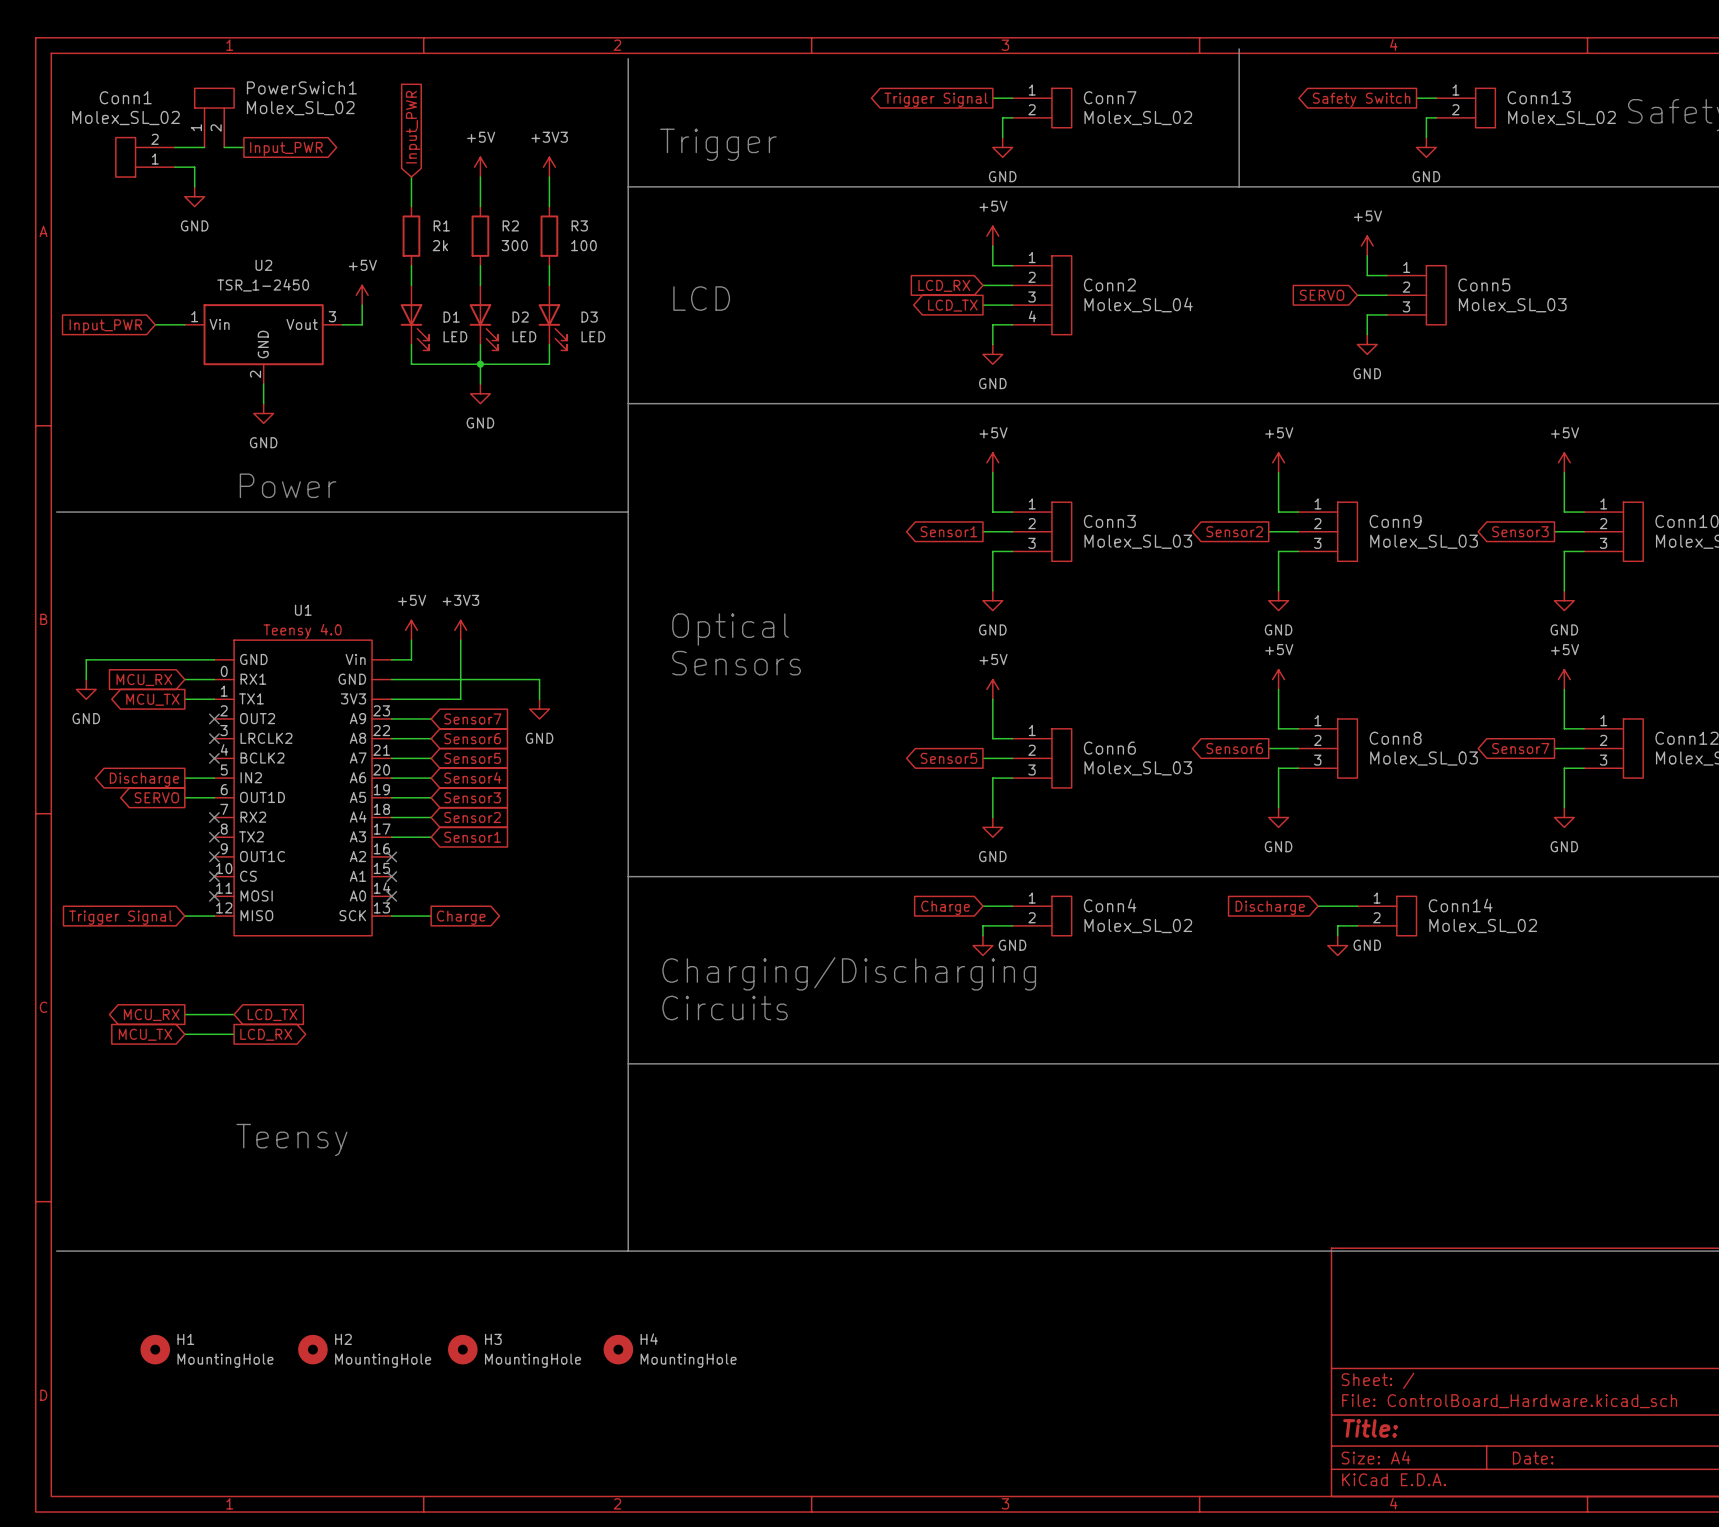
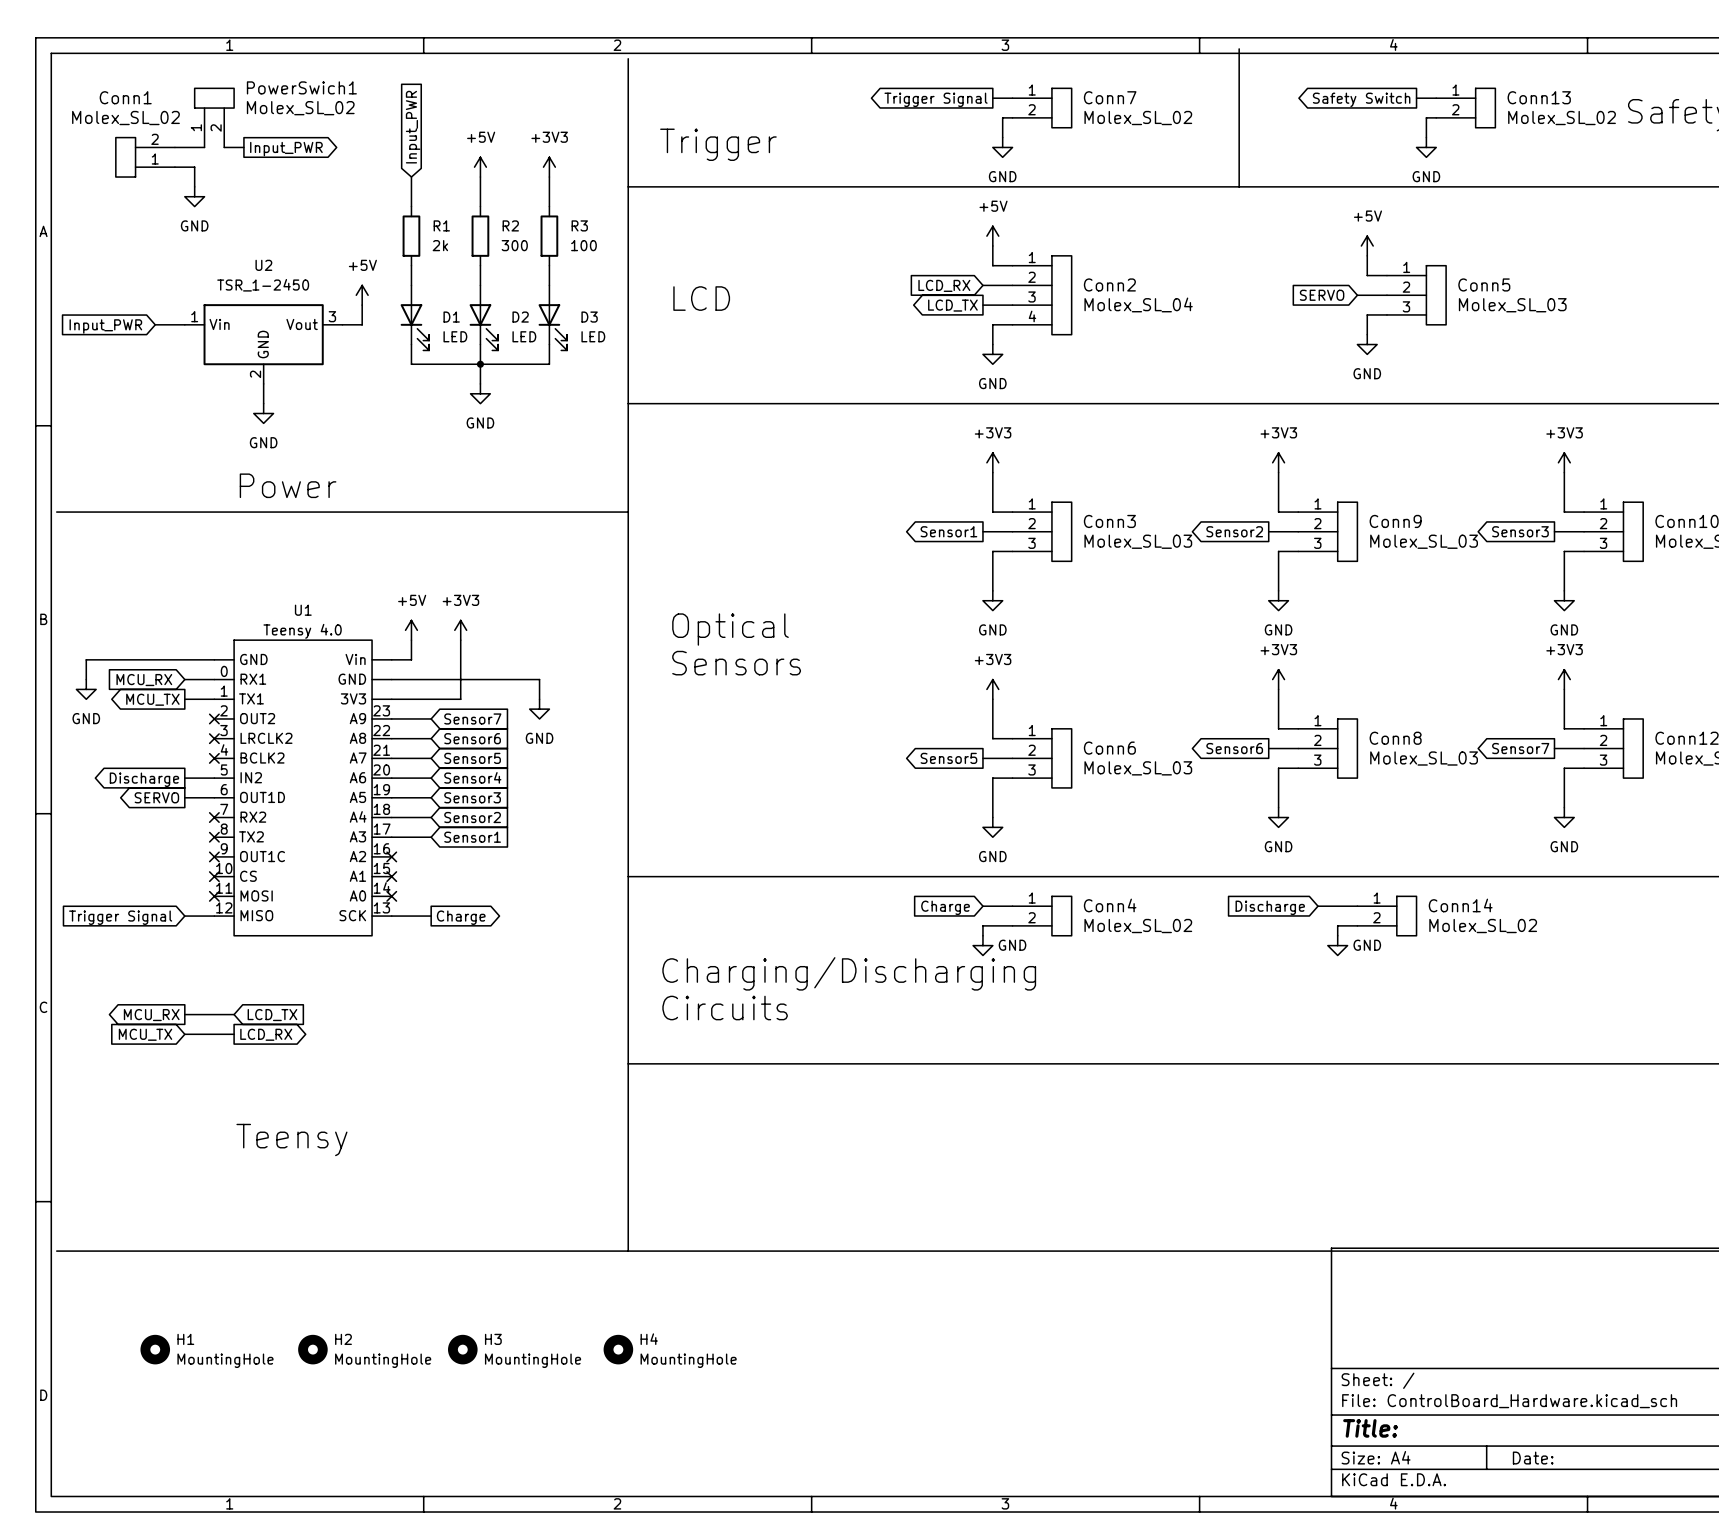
power symbol: +5V (992, 462) -> +3V3 (992, 462)
power symbol: +5V (1278, 462) -> +3V3 (1278, 462)
power symbol: +5V (1564, 462) -> +3V3 (1564, 462)
power symbol: +5V (1278, 679) -> +3V3 (1278, 679)
power symbol: +5V (1564, 679) -> +3V3 (1564, 679)
power symbol: +5V (992, 689) -> +3V3 (992, 689)

